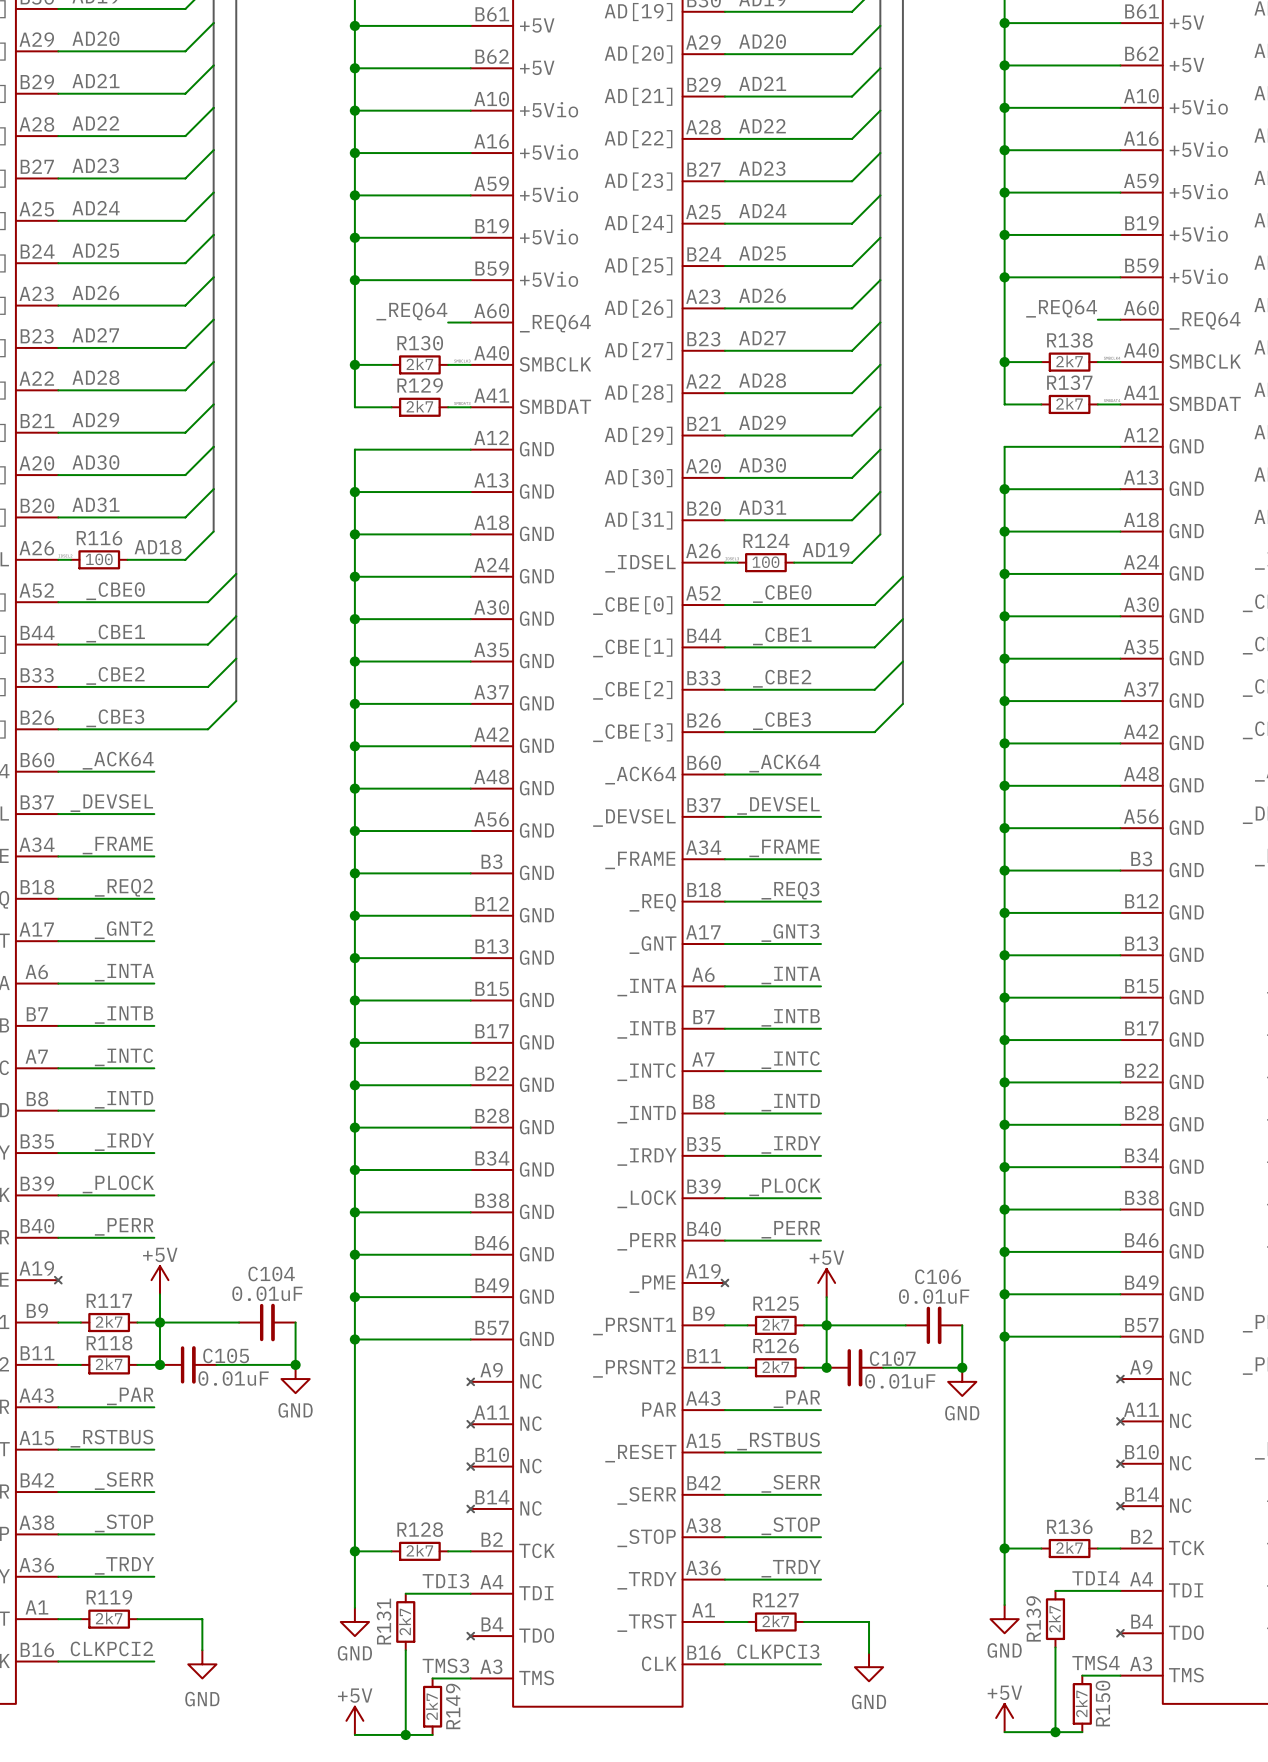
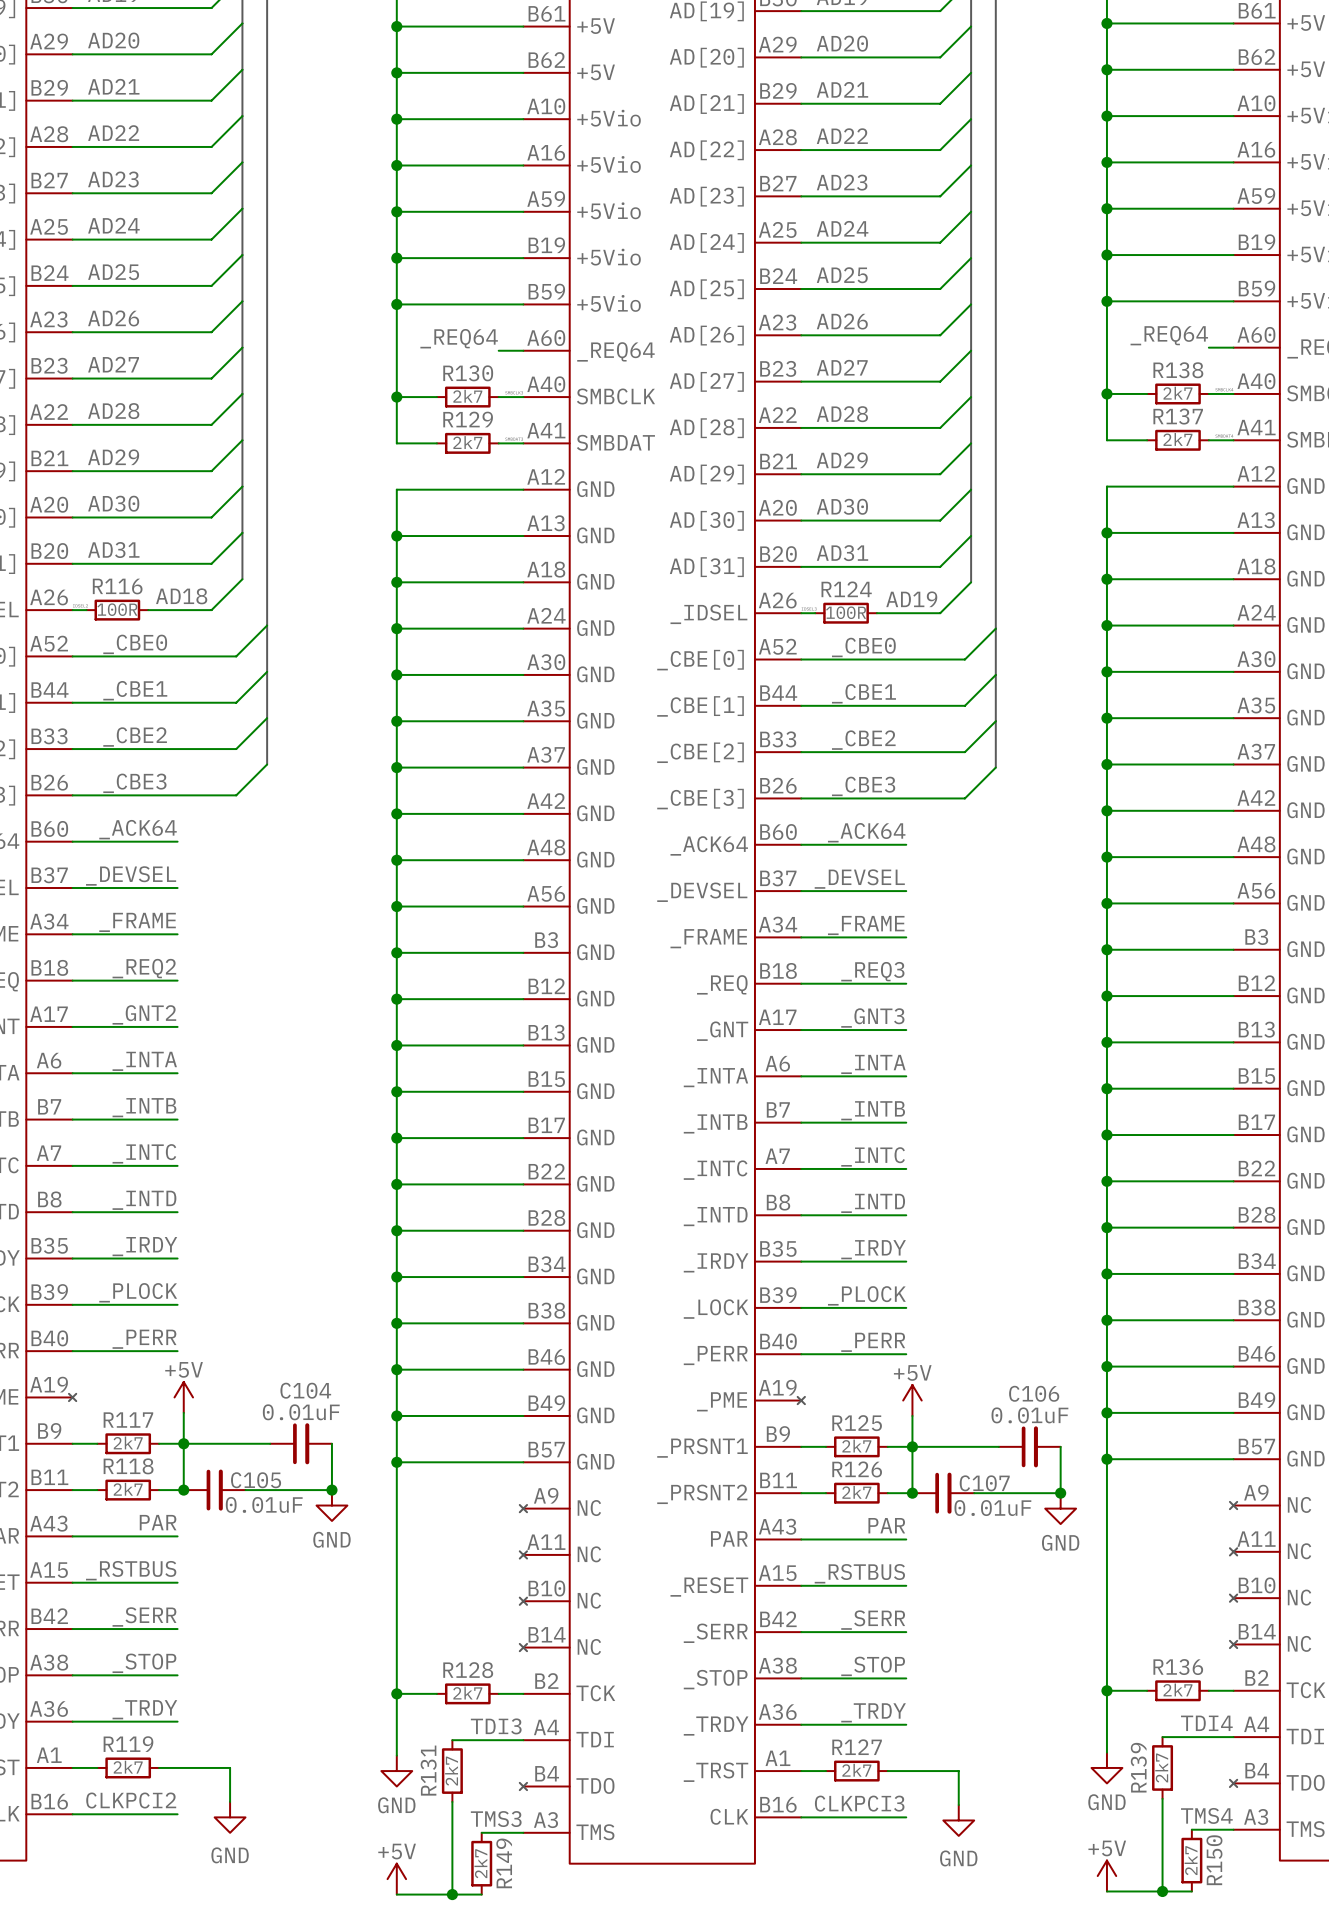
R116 value: 100 (99, 559) -> 100R (117, 609)
R124 value: 100 (765, 562) -> 100R (846, 612)
label: _PAR (130, 1396) -> PAR (158, 1522)
label: _PAR (796, 1399) -> PAR (886, 1525)

